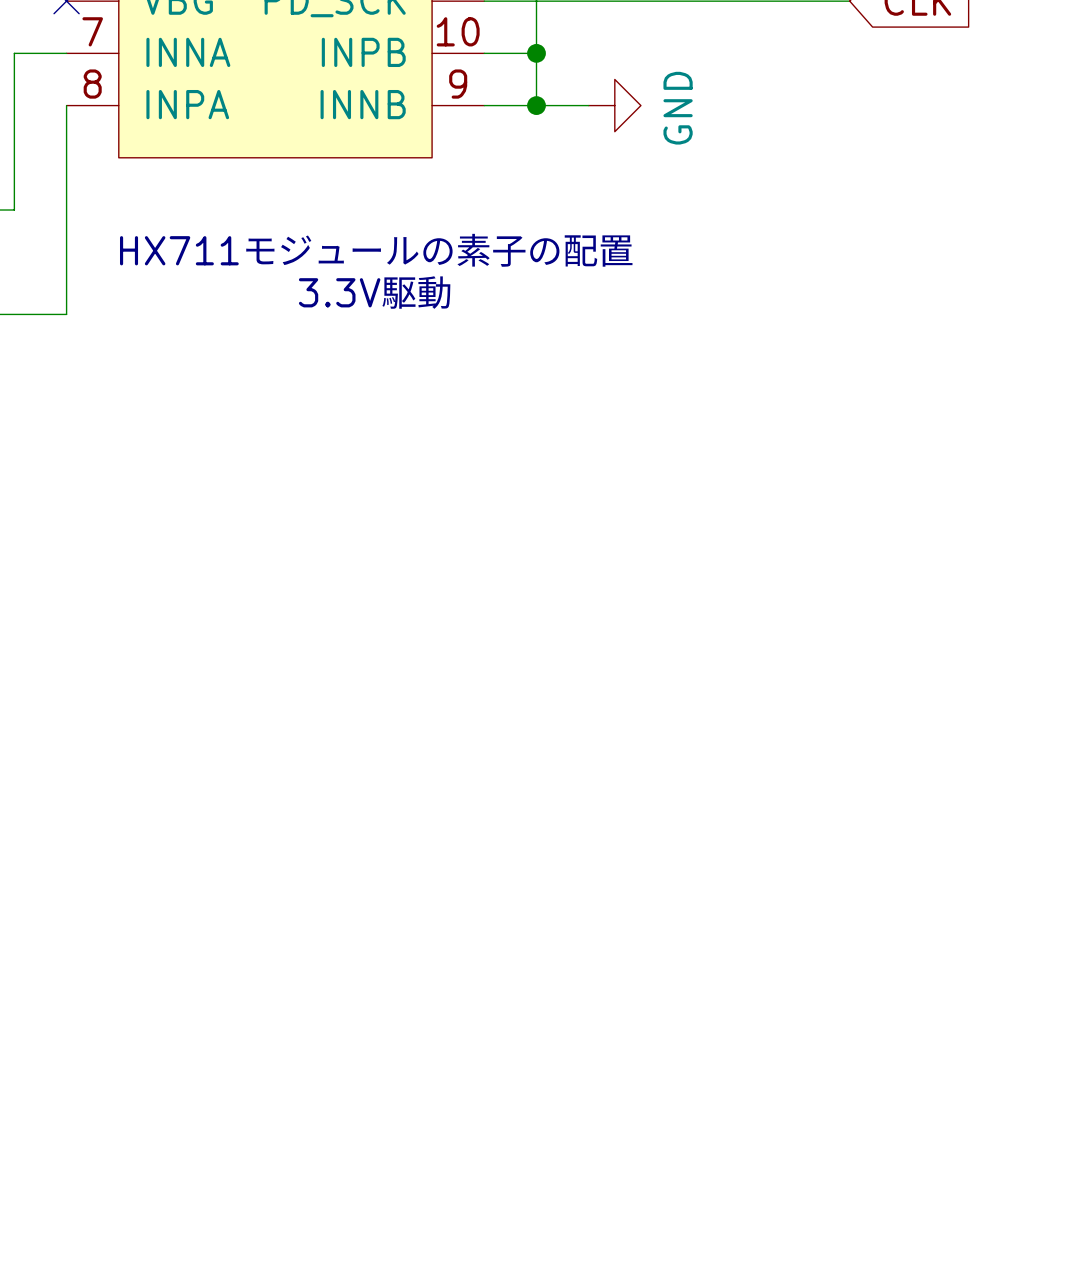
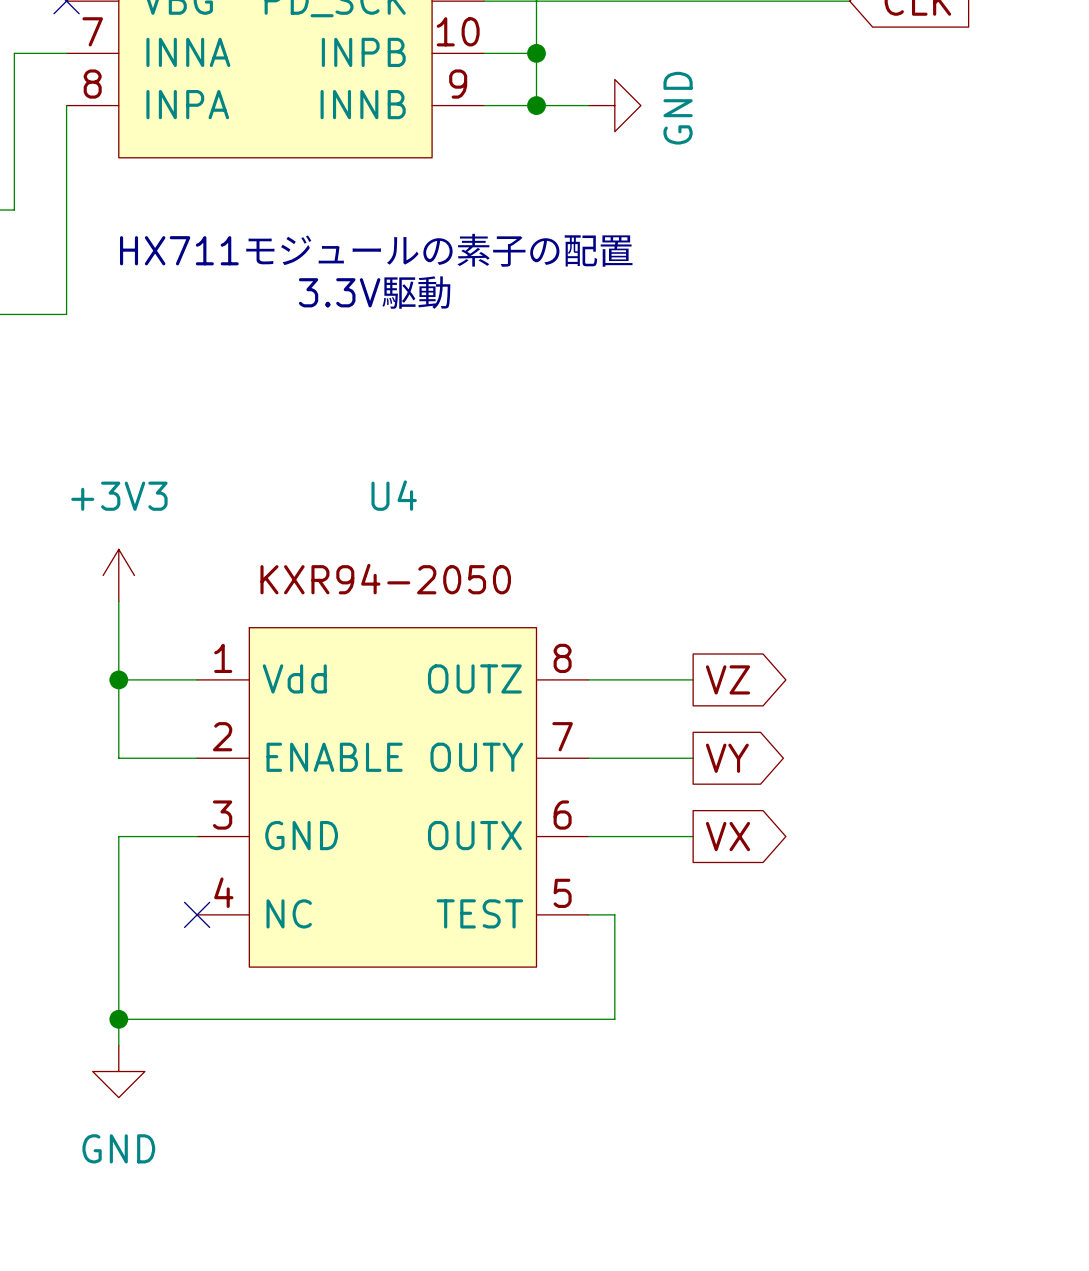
power symbol: none -> +3V3 (118, 575)
wire: none -> (118, 601) (118, 758) (197, 758)
wire: none -> (118, 679) (197, 679)
junction: none -> (118, 679)
wire: none -> (588, 679) (693, 679)
global label: none -> VZ (727, 679)
wire: none -> (588, 758) (693, 758)
global label: none -> VY (727, 758)
U4: none -> (392, 797)
wire: none -> (197, 836) (118, 836) (118, 1045)
wire: none -> (588, 836) (693, 836)
global label: none -> VX (727, 836)
no-connect mark: none -> (197, 914)
wire: none -> (588, 914) (614, 914) (614, 1019) (118, 1019)
junction: none -> (118, 1019)
power symbol: none -> GND (118, 1071)

